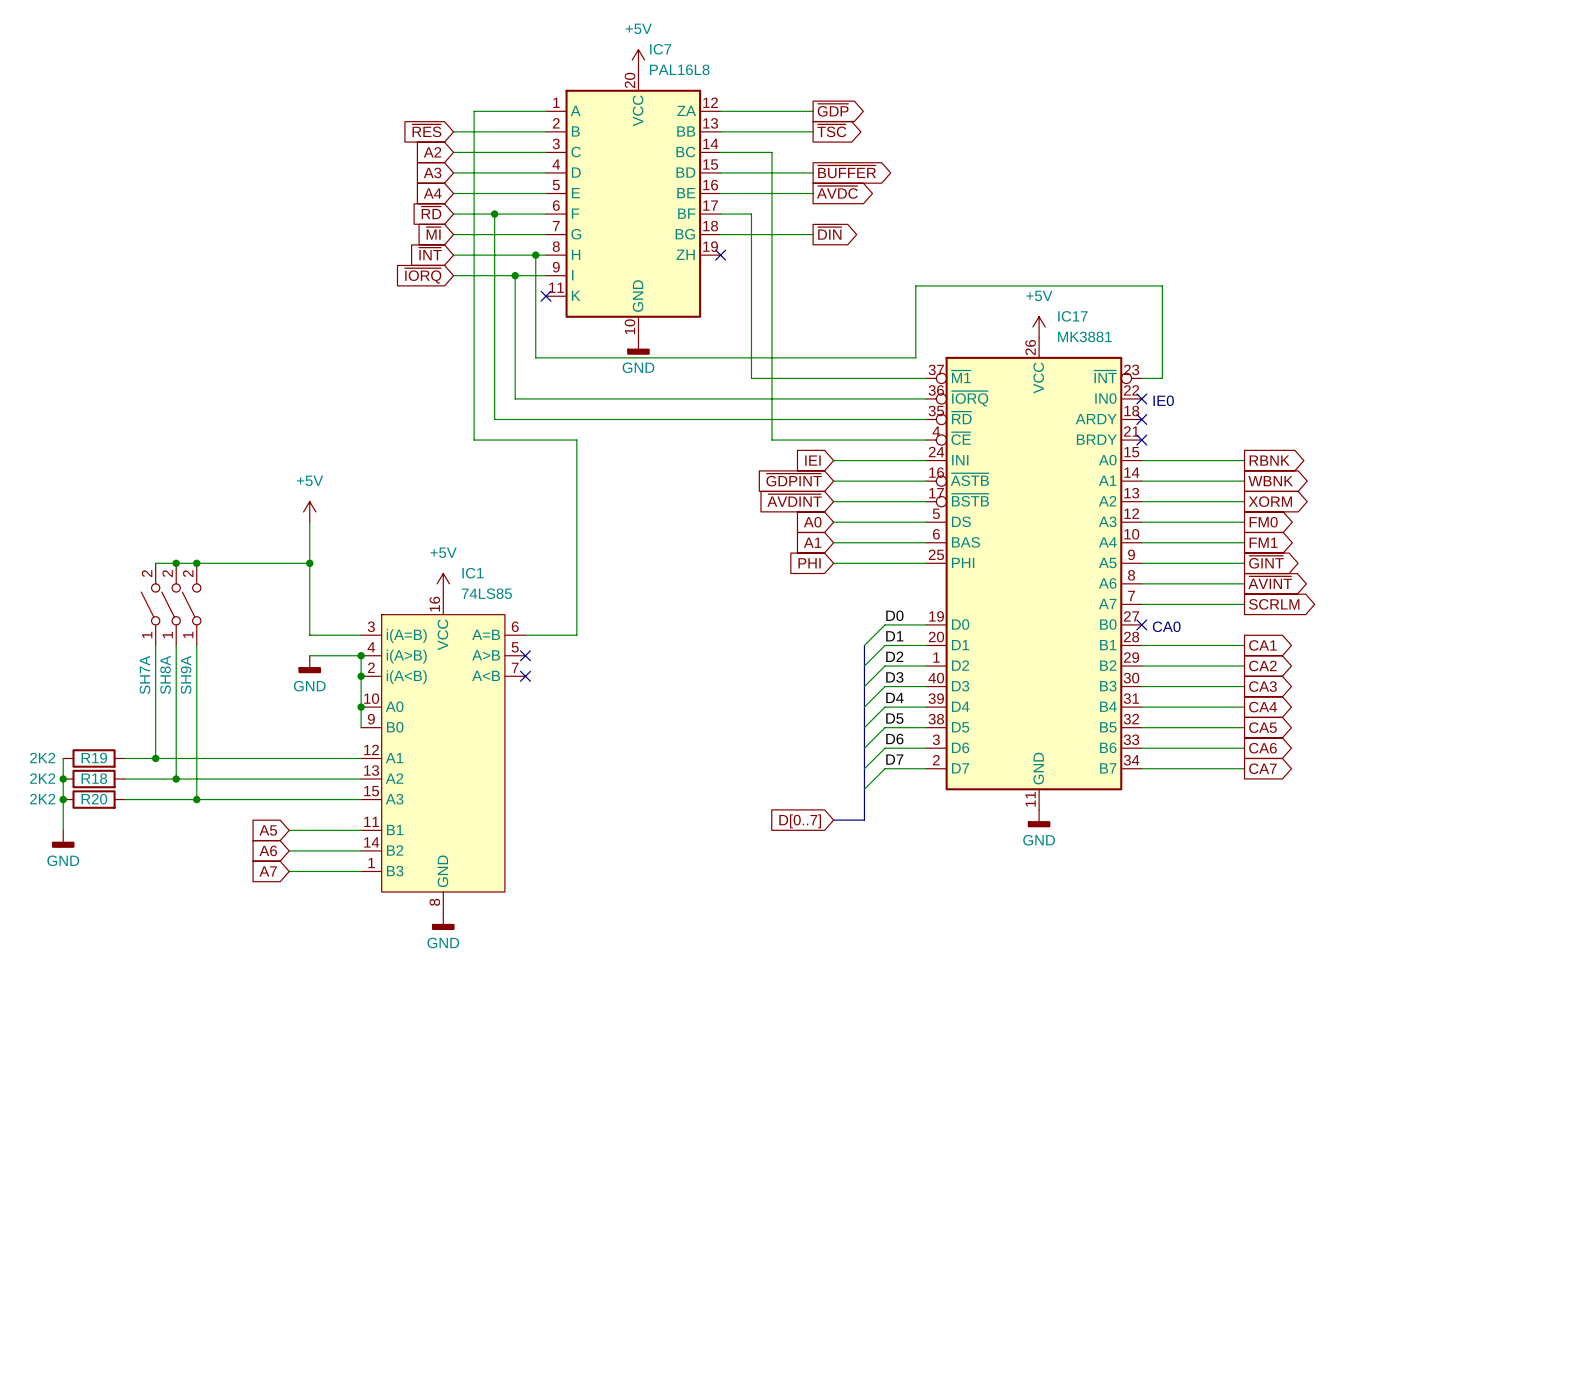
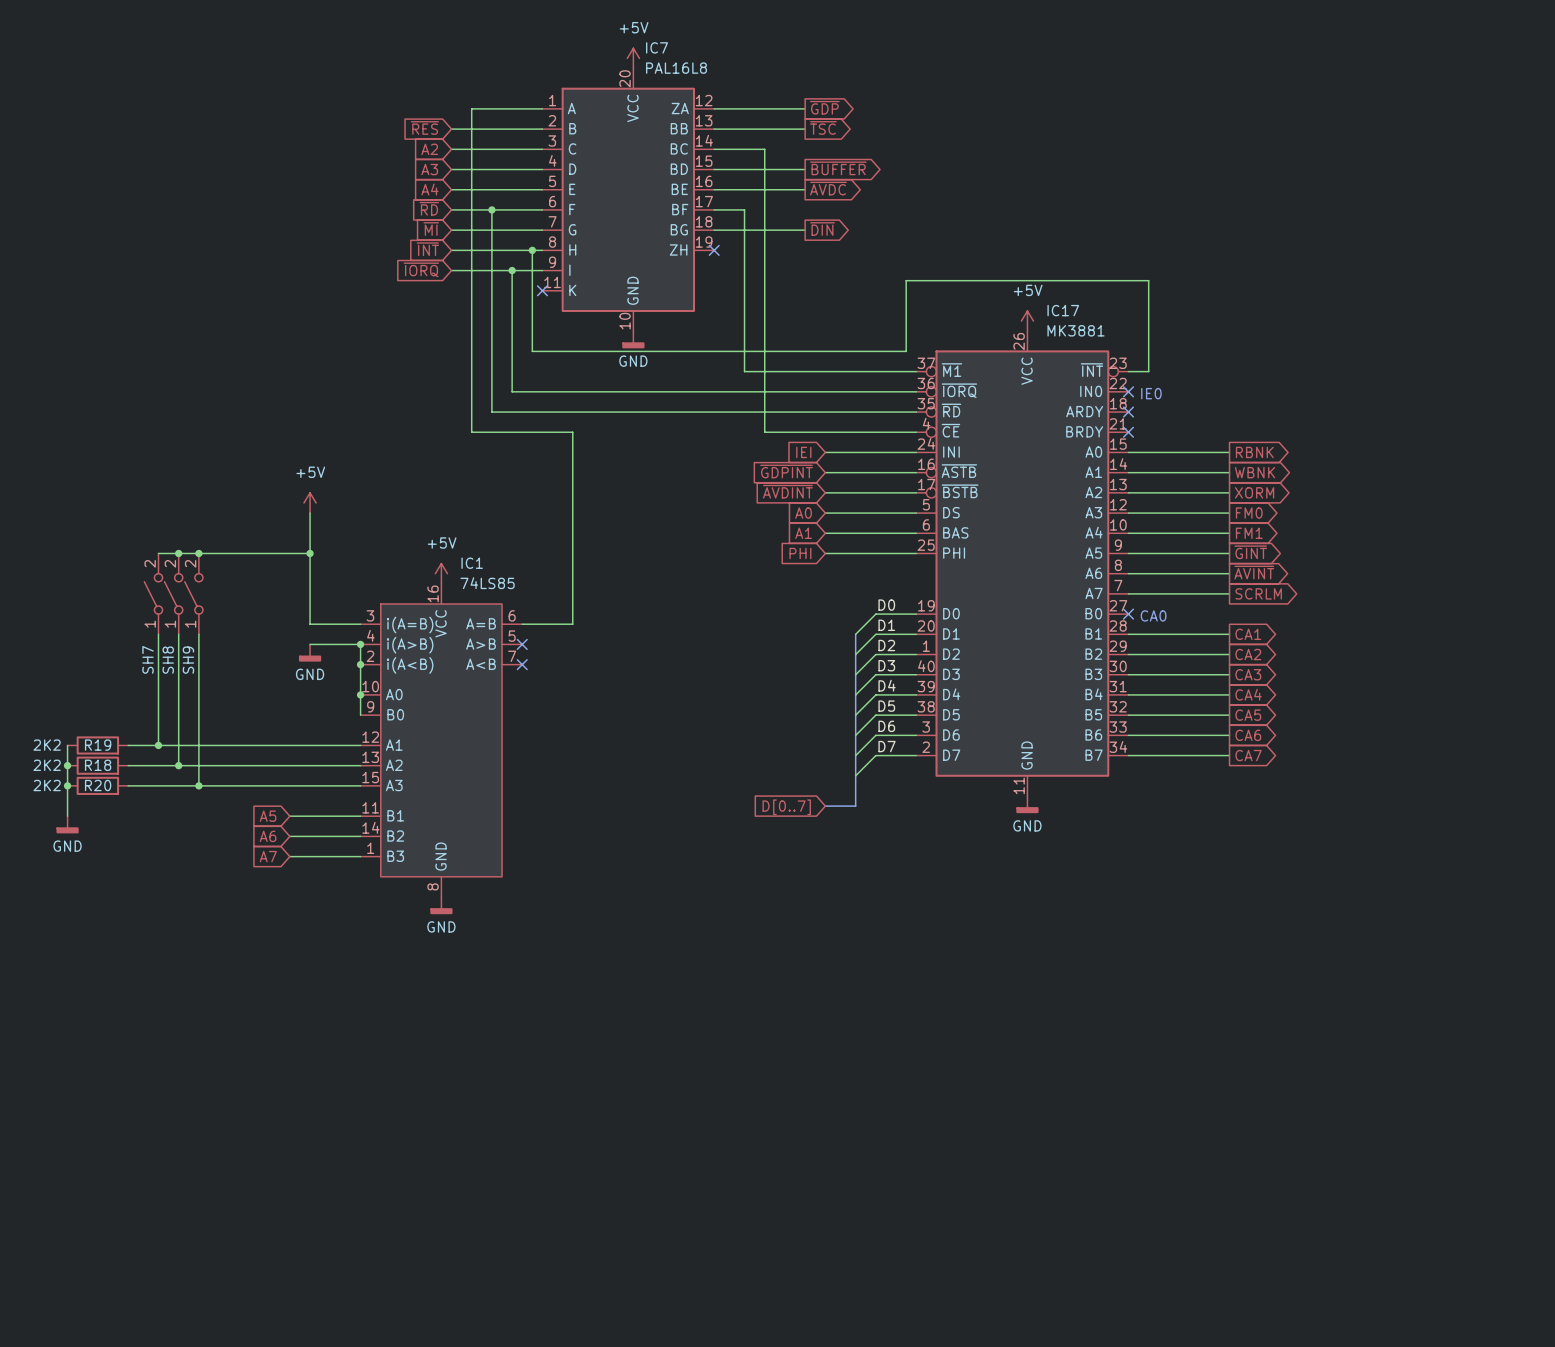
SH7A name: SH7A (145, 674) -> SH7 (148, 659)
SH8A name: SH8A (165, 674) -> SH8 (168, 660)
SH9A name: SH9A (186, 674) -> SH9 (188, 660)

